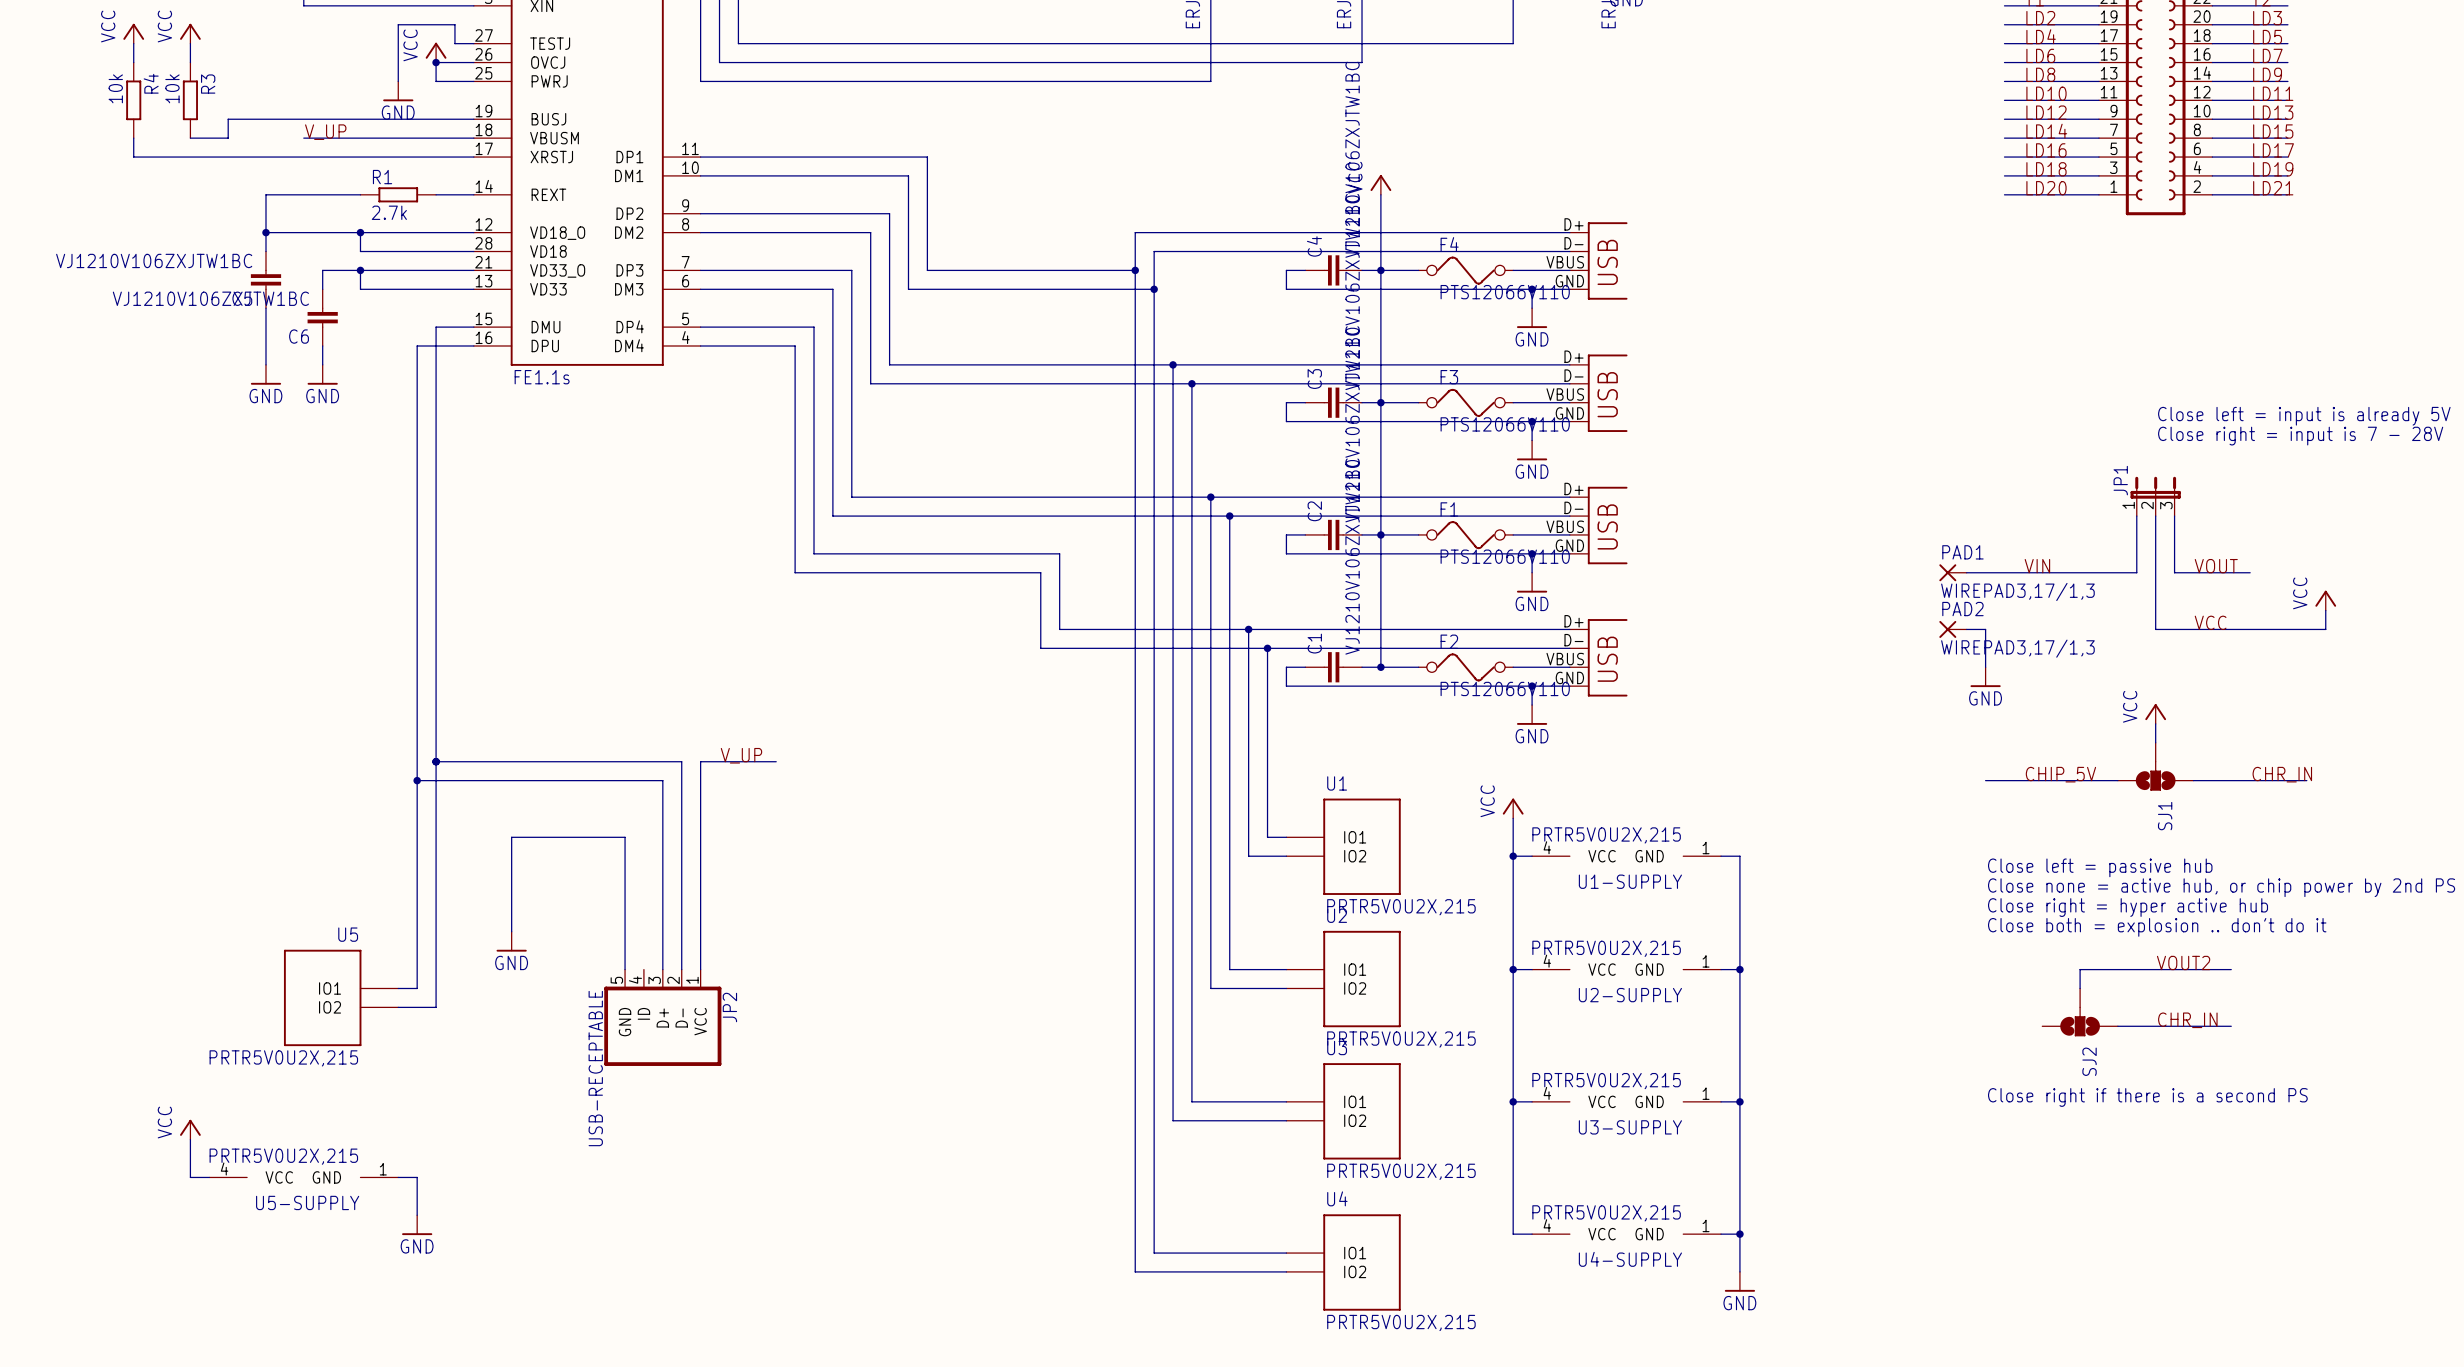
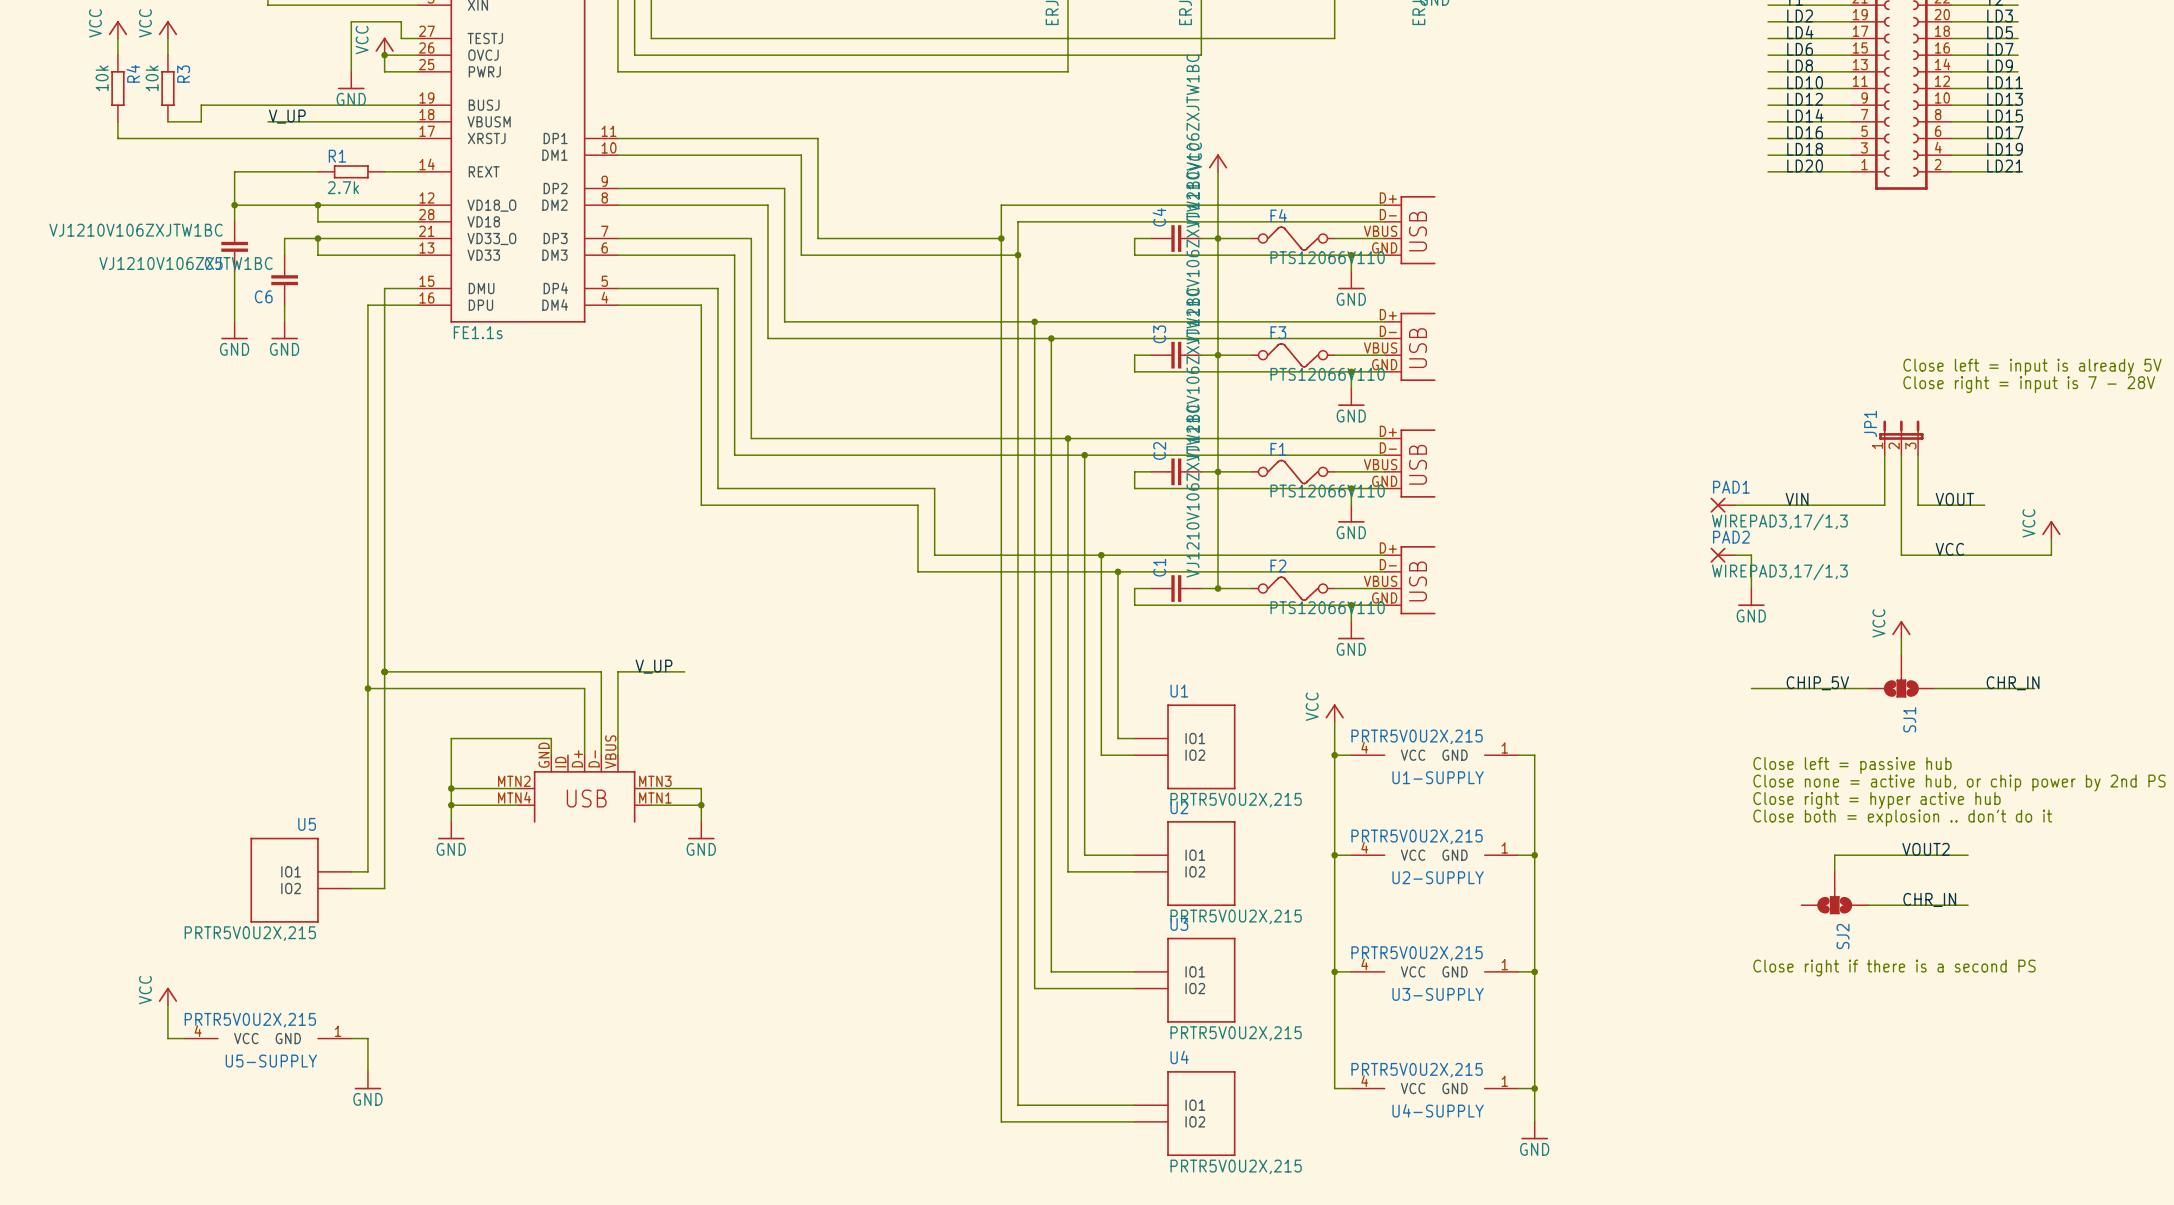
wire: (625, 856) (625, 969) -> none
wire: (662, 856) (662, 969) -> none
wire: (681, 856) (681, 969) -> none
wire: (700, 856) (700, 969) -> none
wire: none -> (451, 788) (517, 788)
junction: none -> (451, 788)
part: none -> (584, 788)
wire: none -> (651, 788) (701, 788) (701, 821)
wire: none -> (451, 805) (517, 805)
junction: none -> (451, 805)
wire: none -> (651, 805) (701, 805)
junction: none -> (701, 805)
power symbol: none -> GND (701, 830)
JP2: USB-RECEPTABLE (662, 1017) -> none

